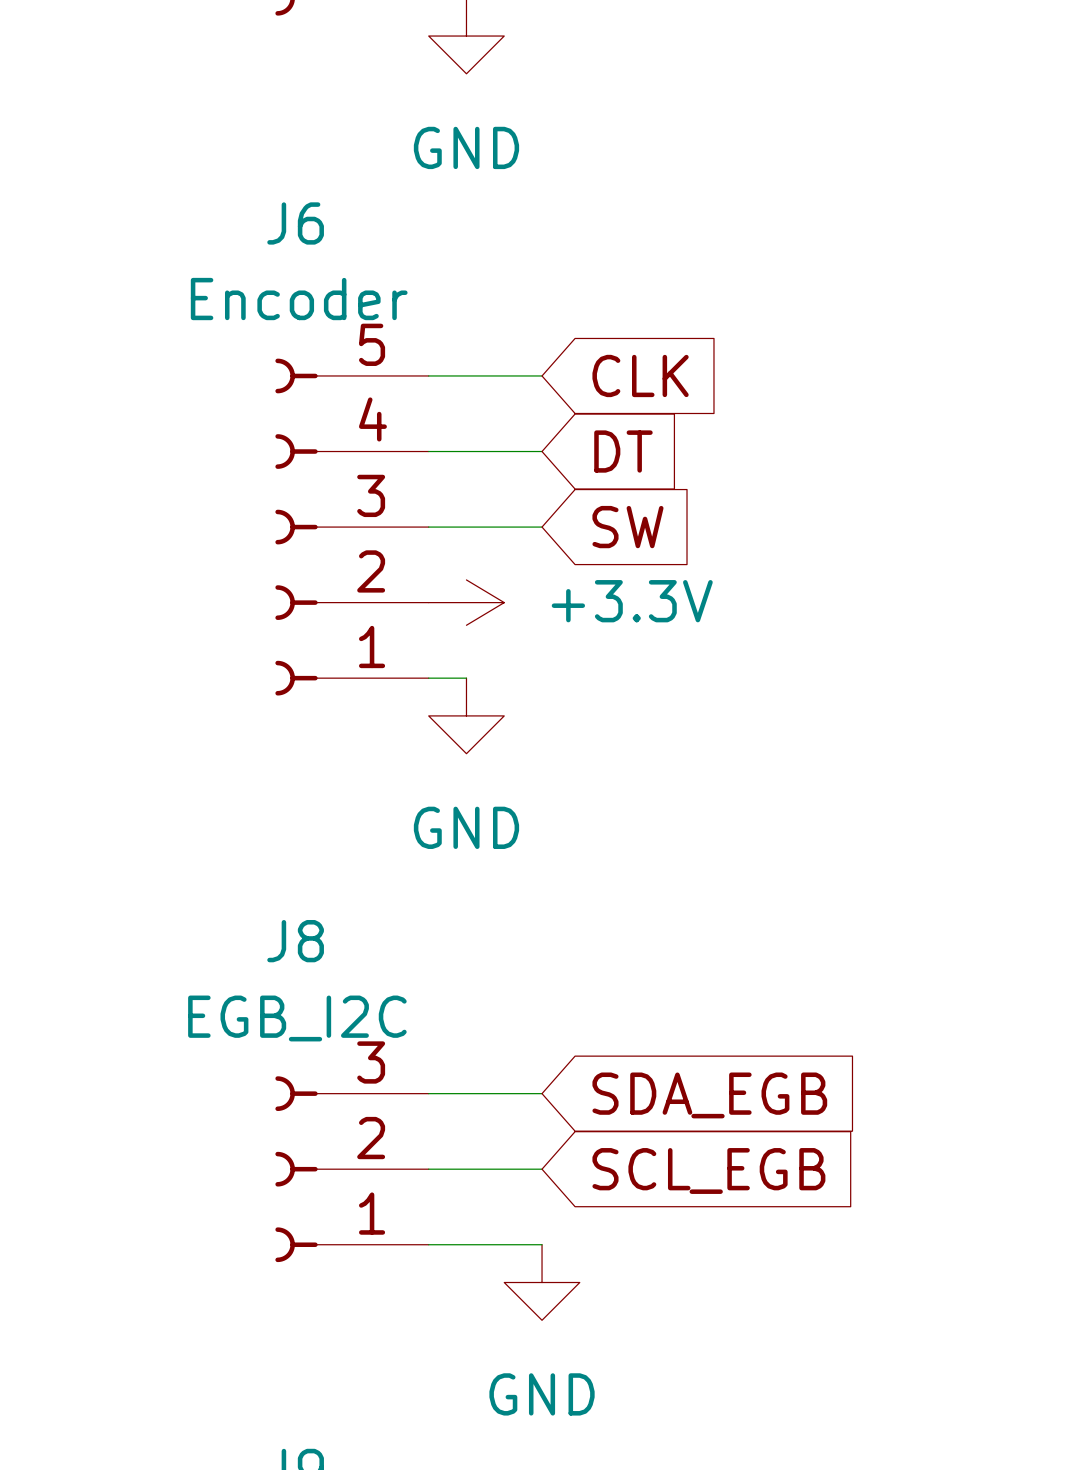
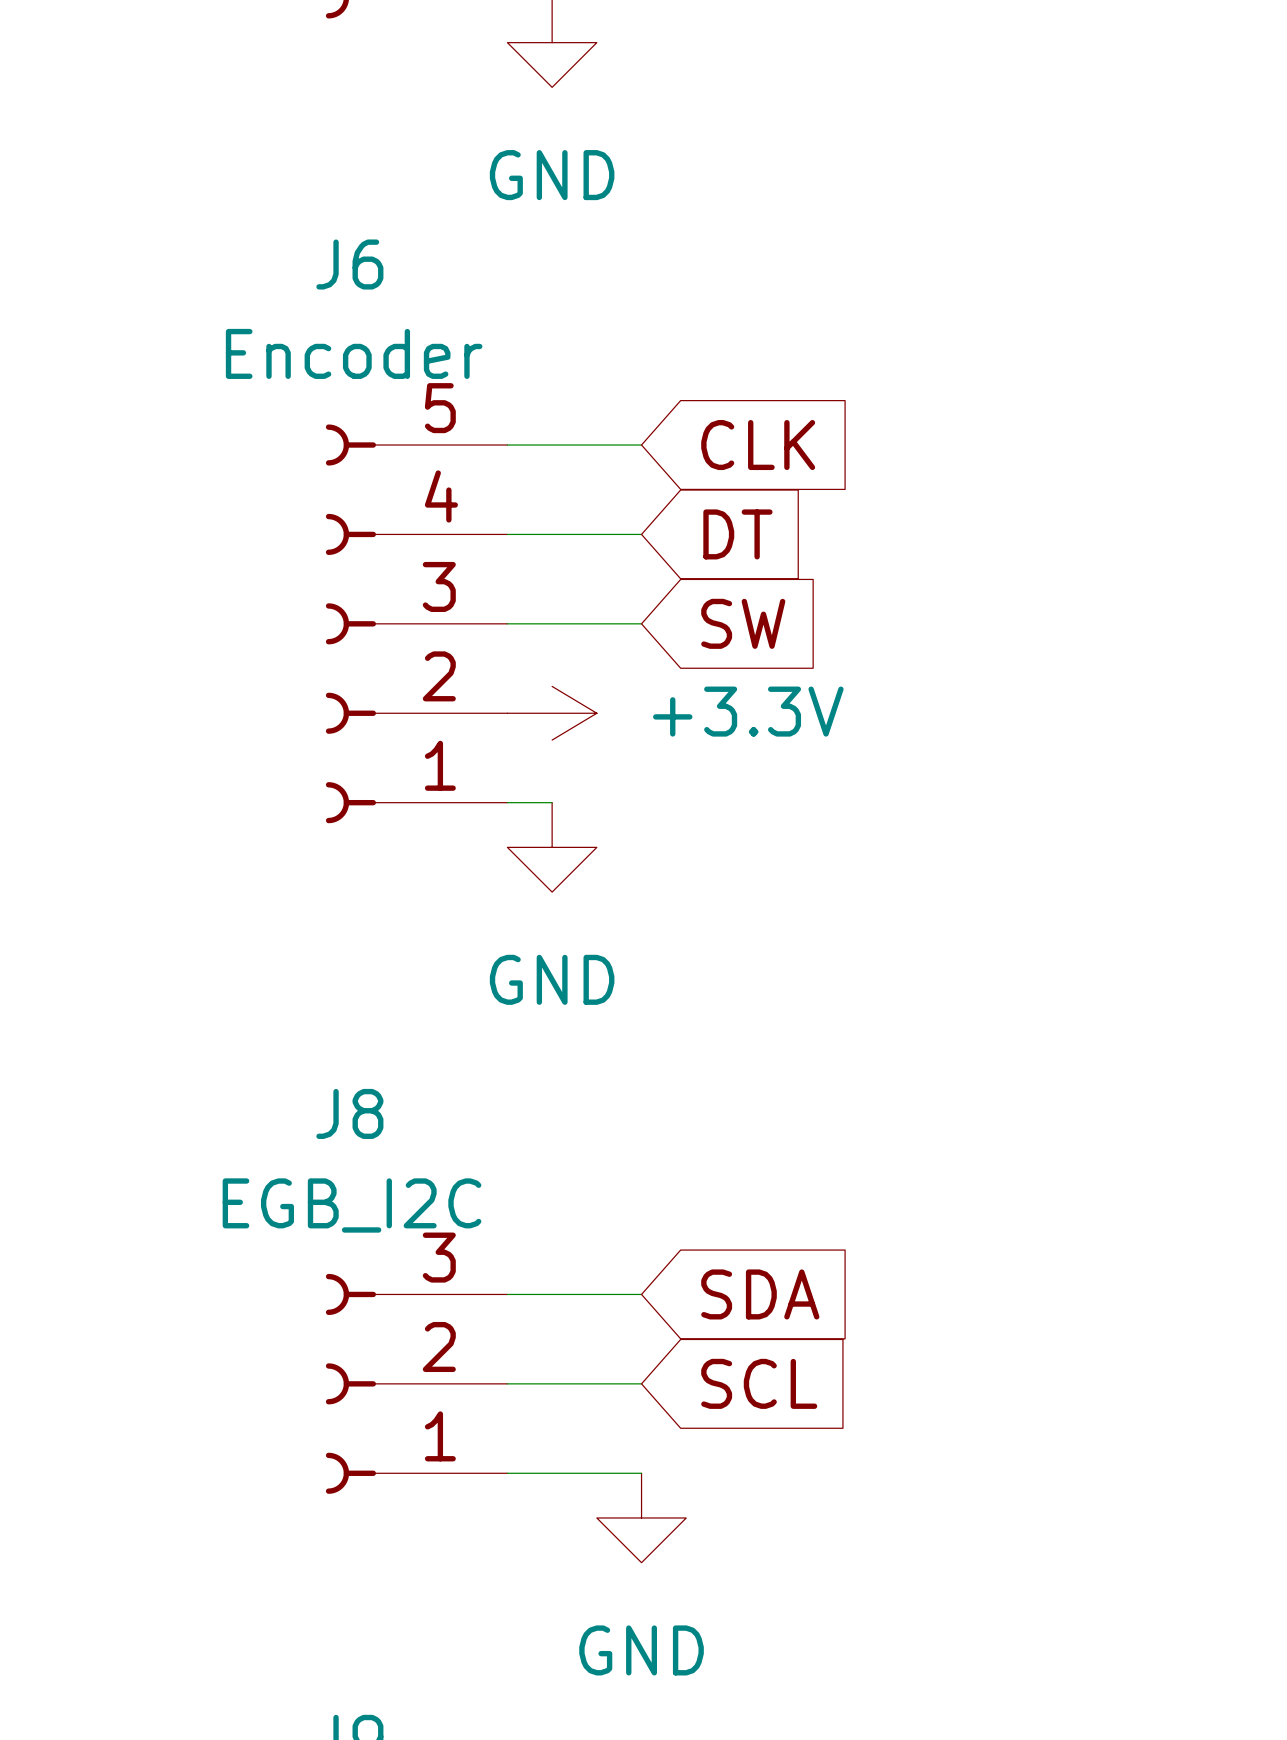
global label: SDA_EGB (709, 1095) -> SDA (760, 1294)
global label: SCL_EGB (708, 1170) -> SCL (759, 1383)

